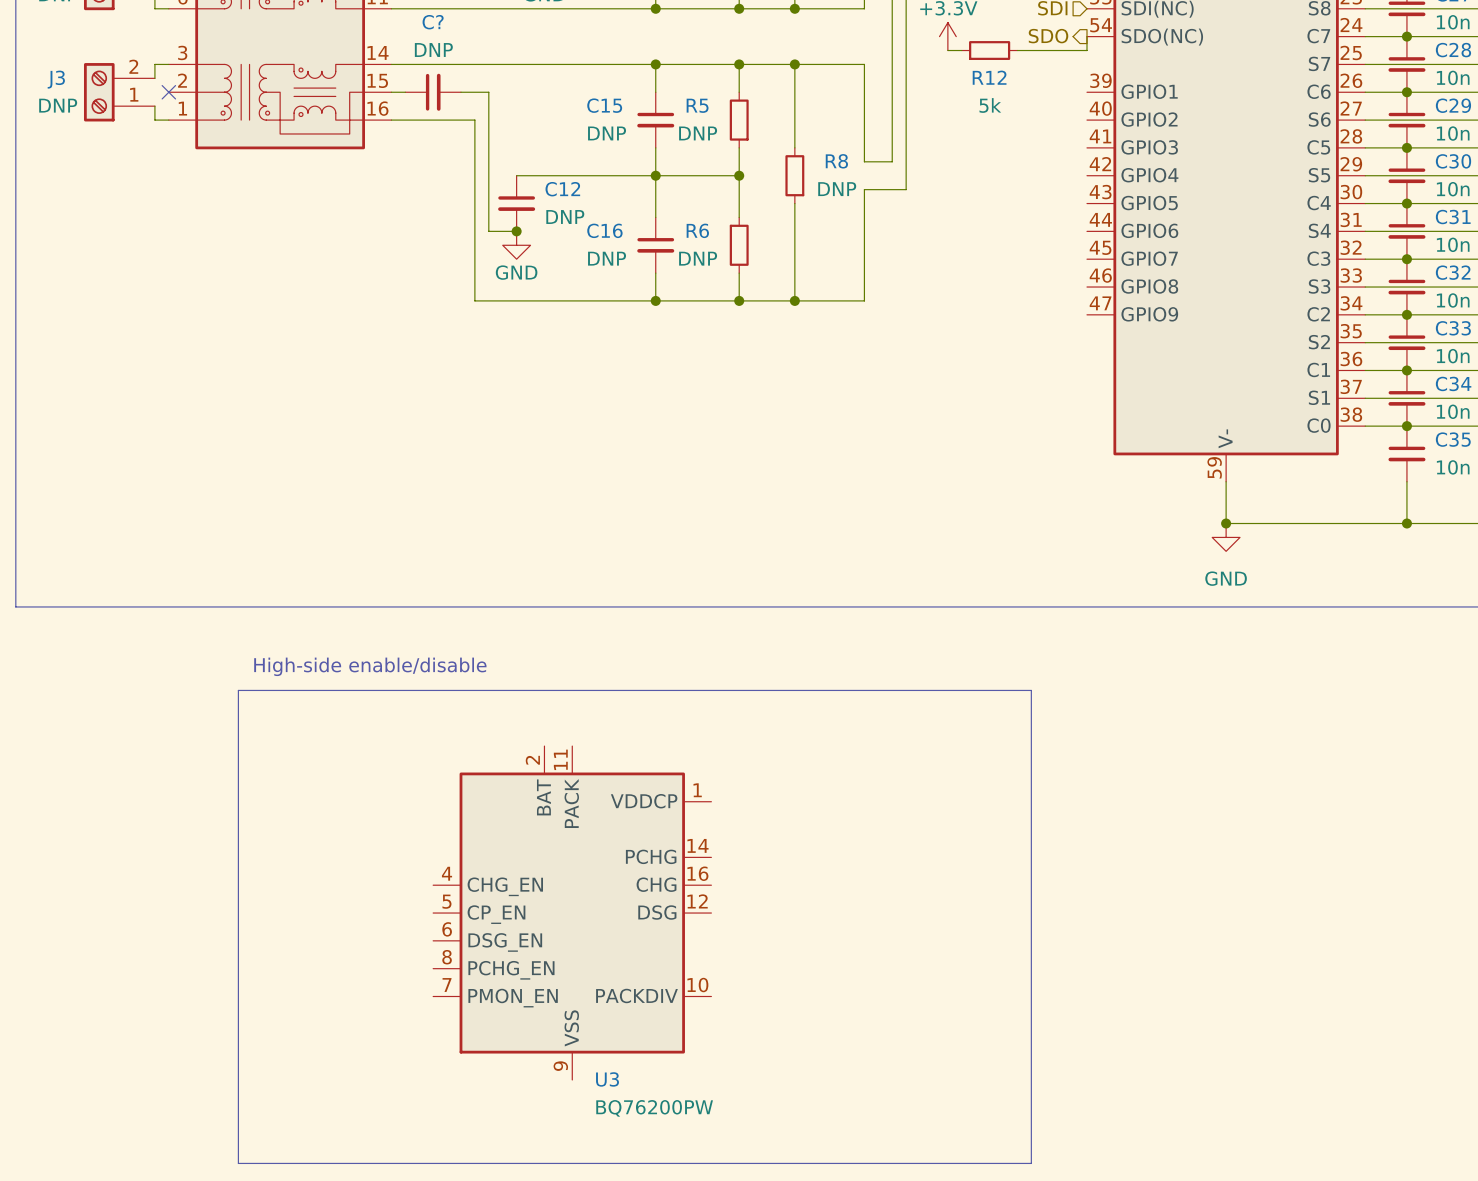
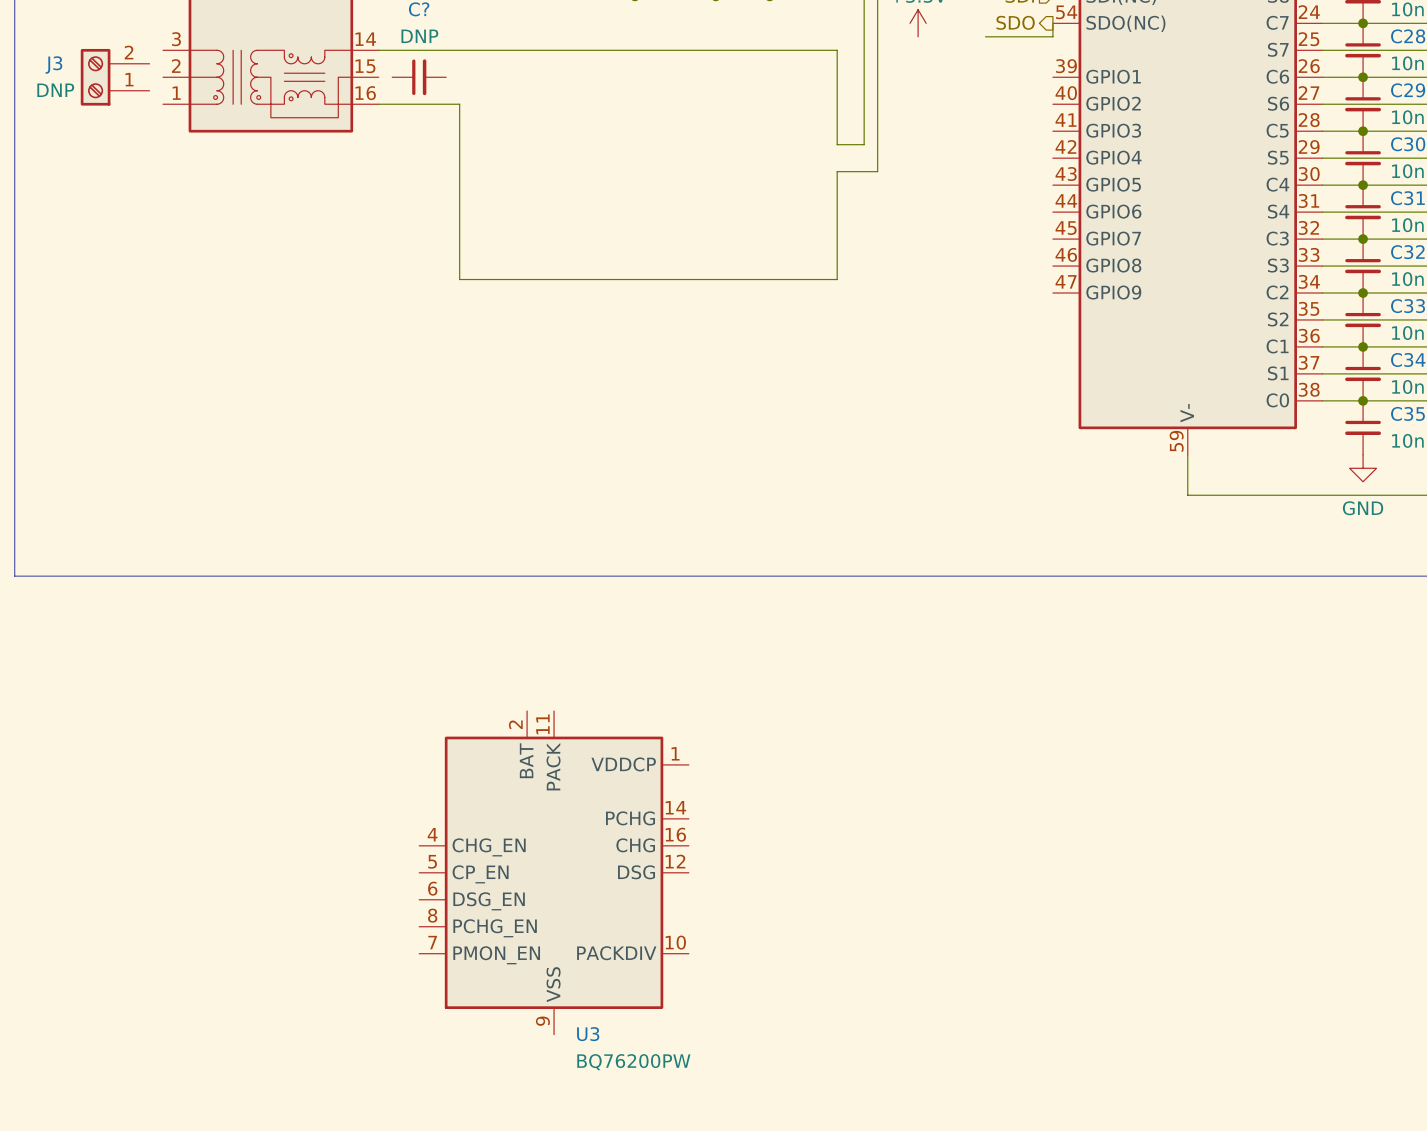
wire: (947, 50) (961, 50) -> none
R12: 5k (989, 50) -> none
wire: (168, 64) (154, 64) (154, 78) -> none
wire: (655, 64) (655, 92) -> none
junction: (655, 64) -> none
wire: (739, 64) (739, 92) -> none
junction: (739, 64) -> none
wire: (794, 64) (794, 147) -> none
junction: (794, 64) -> none
no-connect mark: (168, 92) -> none
wire: (391, 92) (405, 92) -> none
wire: (460, 92) (488, 92) (488, 231) (516, 231) -> none
wire: (154, 106) (154, 120) (168, 120) -> none
C15: DNP (655, 120) -> none
R5: DNP (739, 120) -> none
wire: (655, 147) (655, 217) -> none
wire: (739, 147) (739, 217) -> none
wire: (516, 175) (739, 175) -> none
junction: (655, 175) -> none
junction: (739, 175) -> none
R8: DNP (794, 175) -> none
C12: DNP (516, 203) -> none
wire: (794, 203) (794, 300) -> none
junction: (516, 231) -> none
power symbol: GND (516, 245) -> none
C16: DNP (655, 245) -> none
R6: DNP (739, 245) -> none
wire: (655, 273) (655, 300) -> none
wire: (739, 273) (739, 300) -> none
junction: (655, 300) -> none
junction: (739, 300) -> none
junction: (794, 300) -> none
wire: (1406, 481) (1406, 523) -> none
junction: (1226, 523) -> none
junction: (1406, 523) -> none
power symbol position: GND (1226, 537) -> GND (1363, 468)
text: High-side enable/disable (370, 666) -> none
line: (238, 690) (238, 1163) (1031, 1163) (1031, 690) (238, 690) -> none

